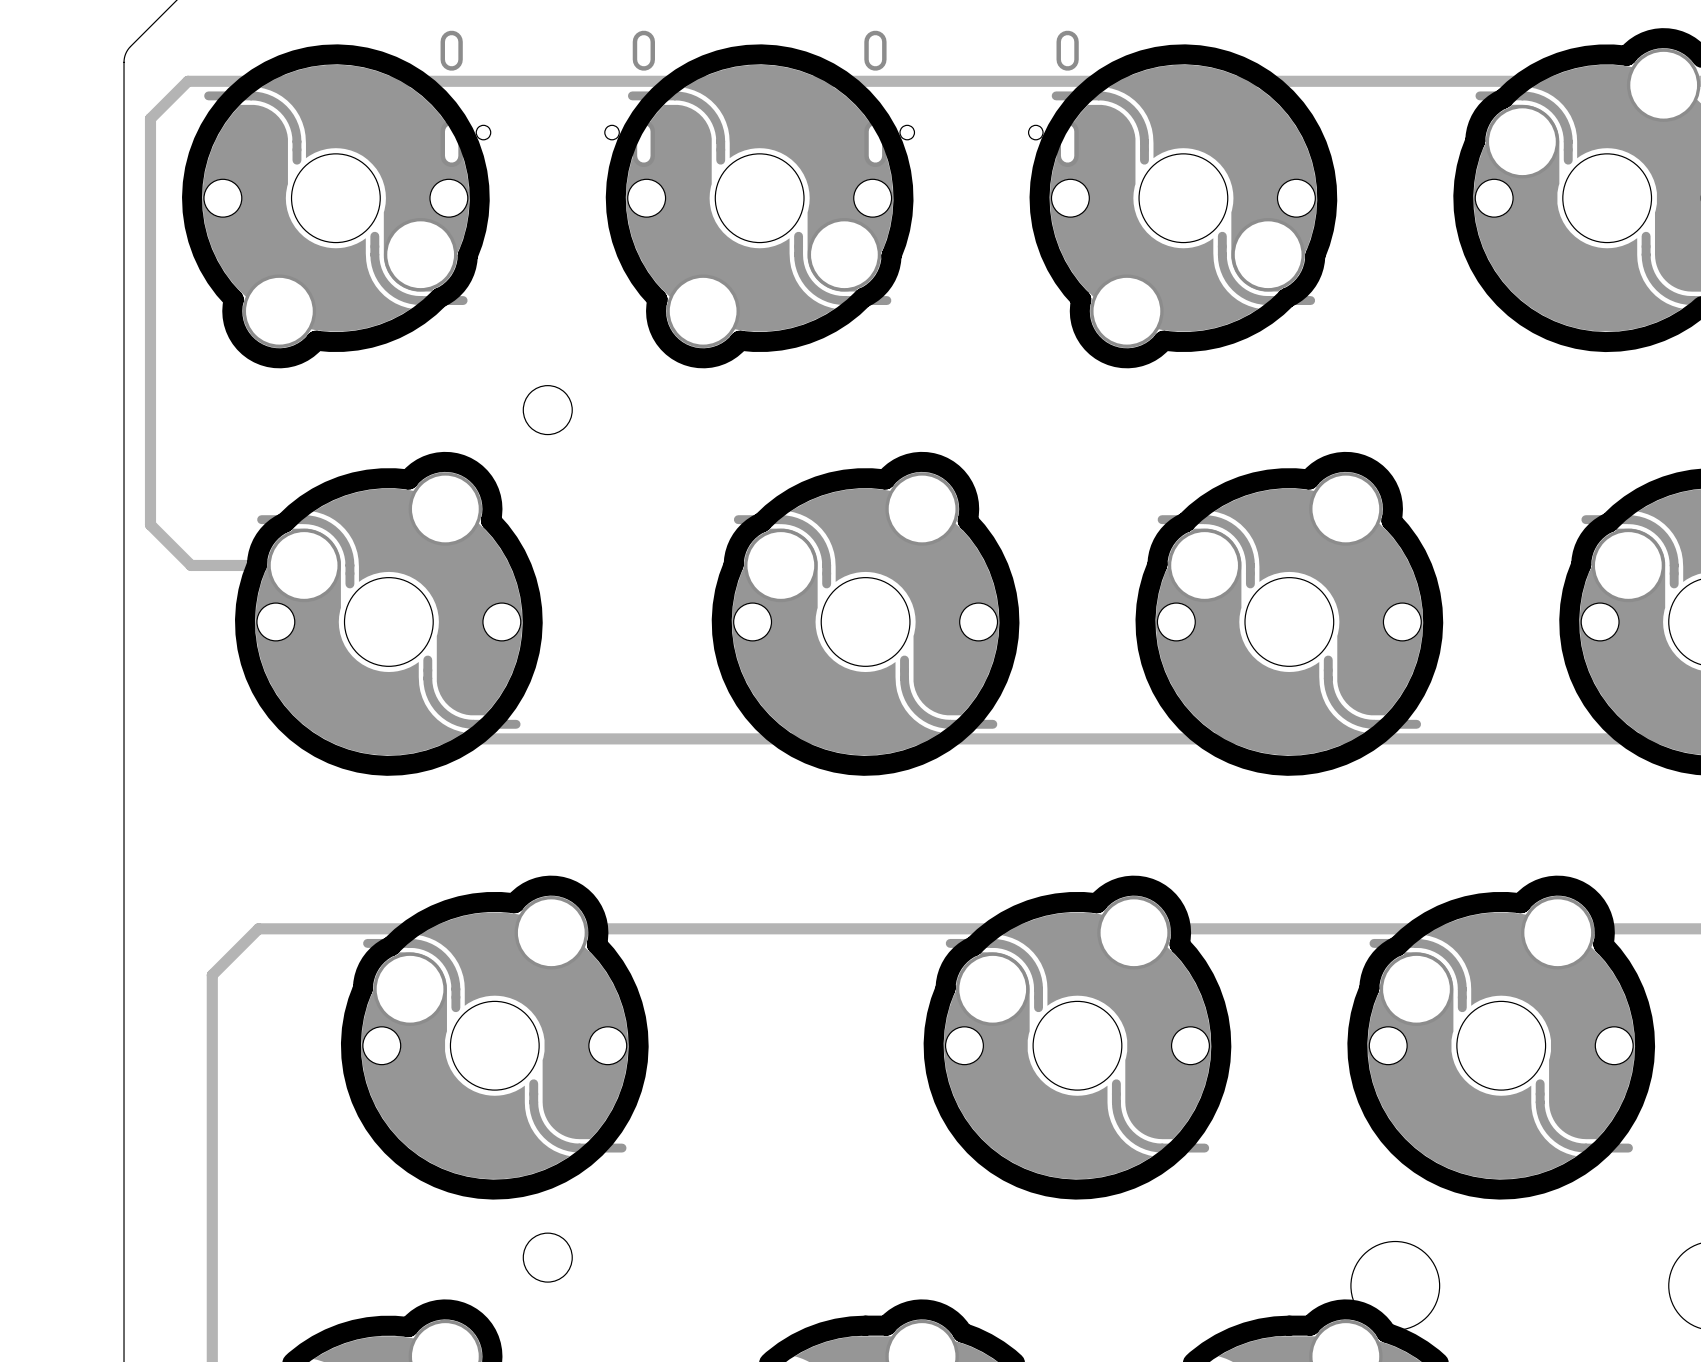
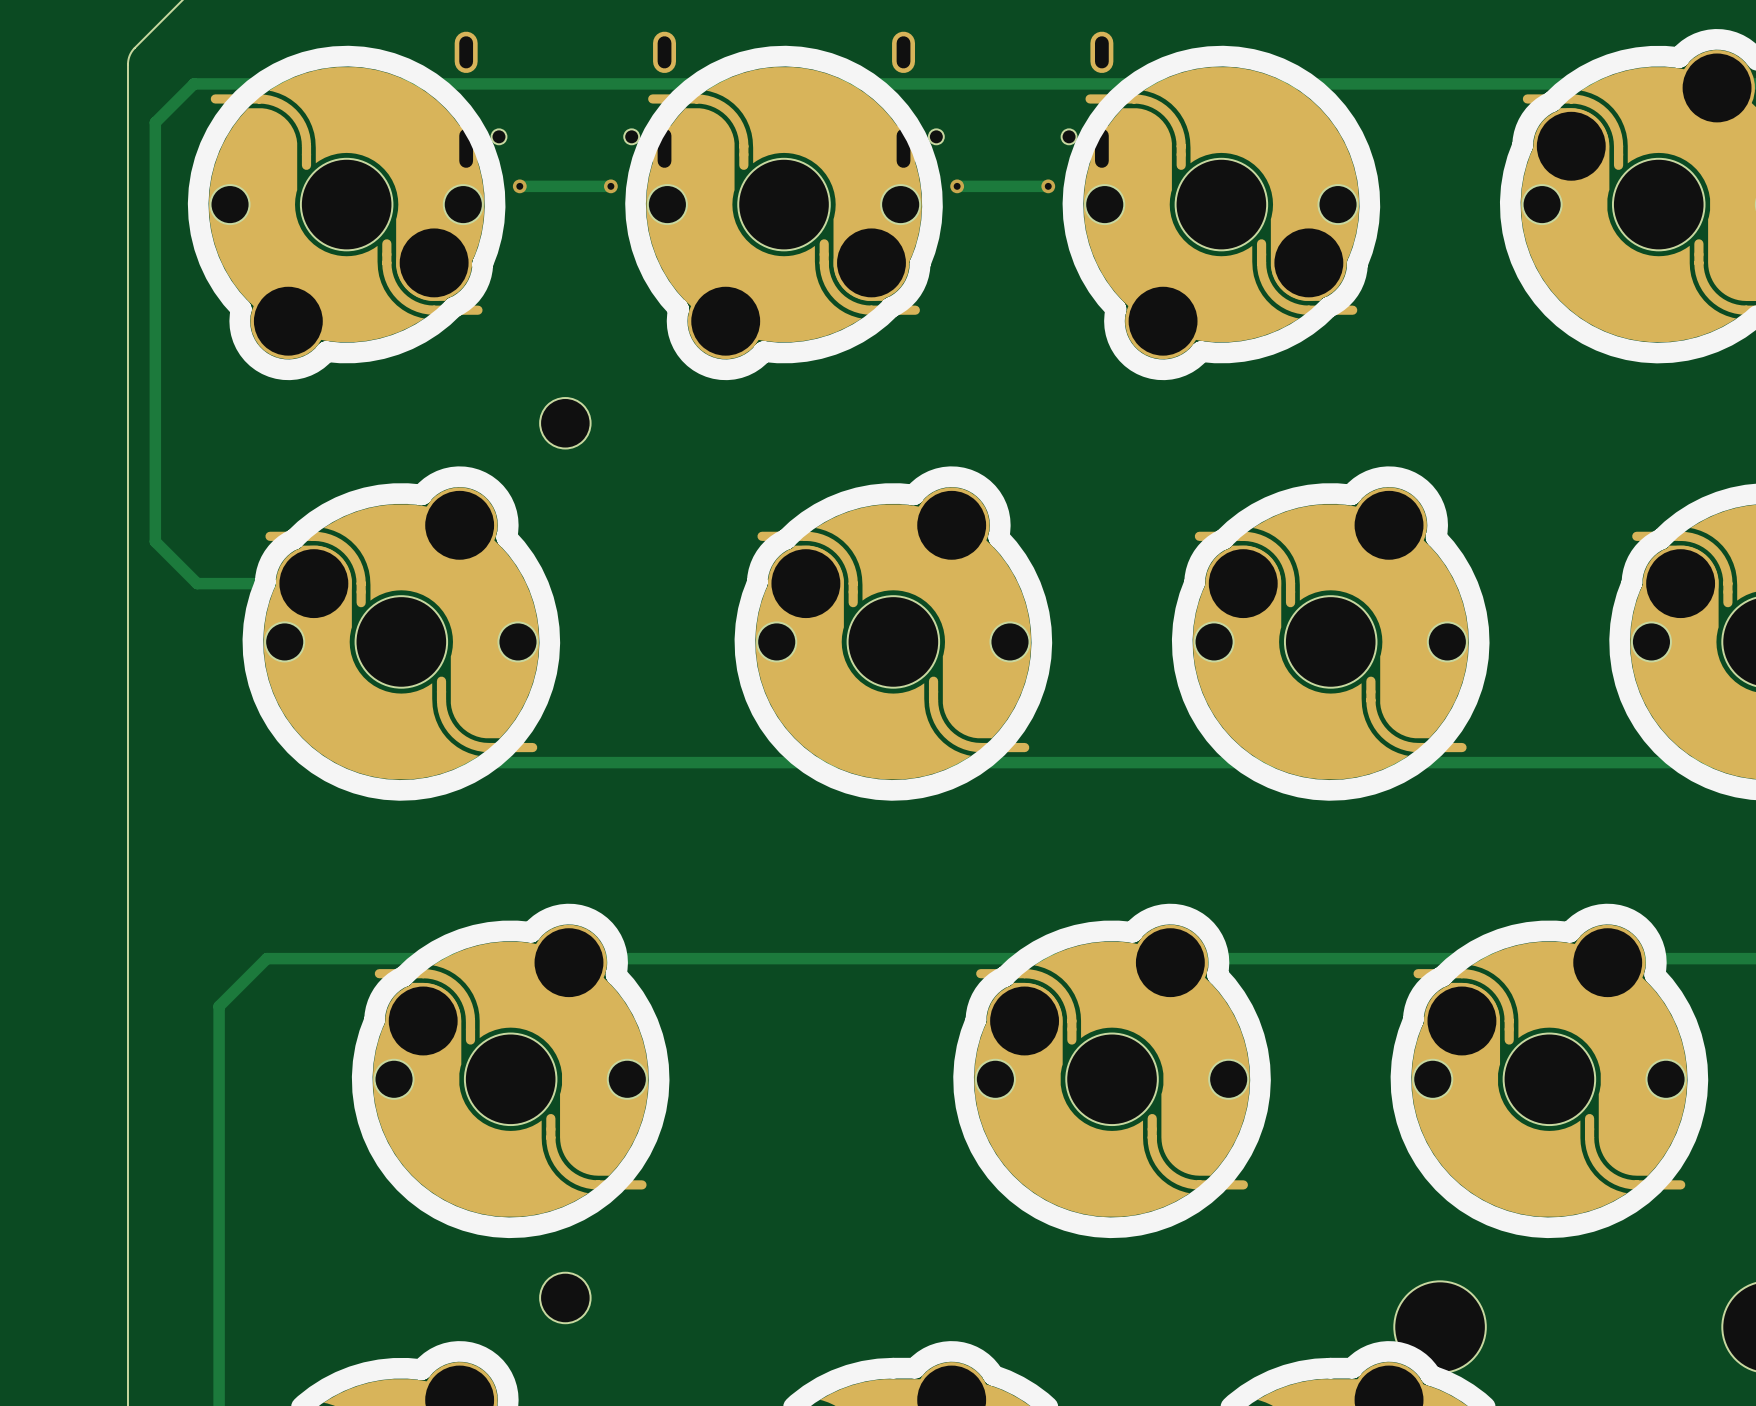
track: none -> (519, 186) (610, 186)
via: none -> (519, 186)
via: none -> (610, 186)
track: none -> (957, 186) (1048, 186)
via: none -> (957, 186)
via: none -> (1048, 186)

